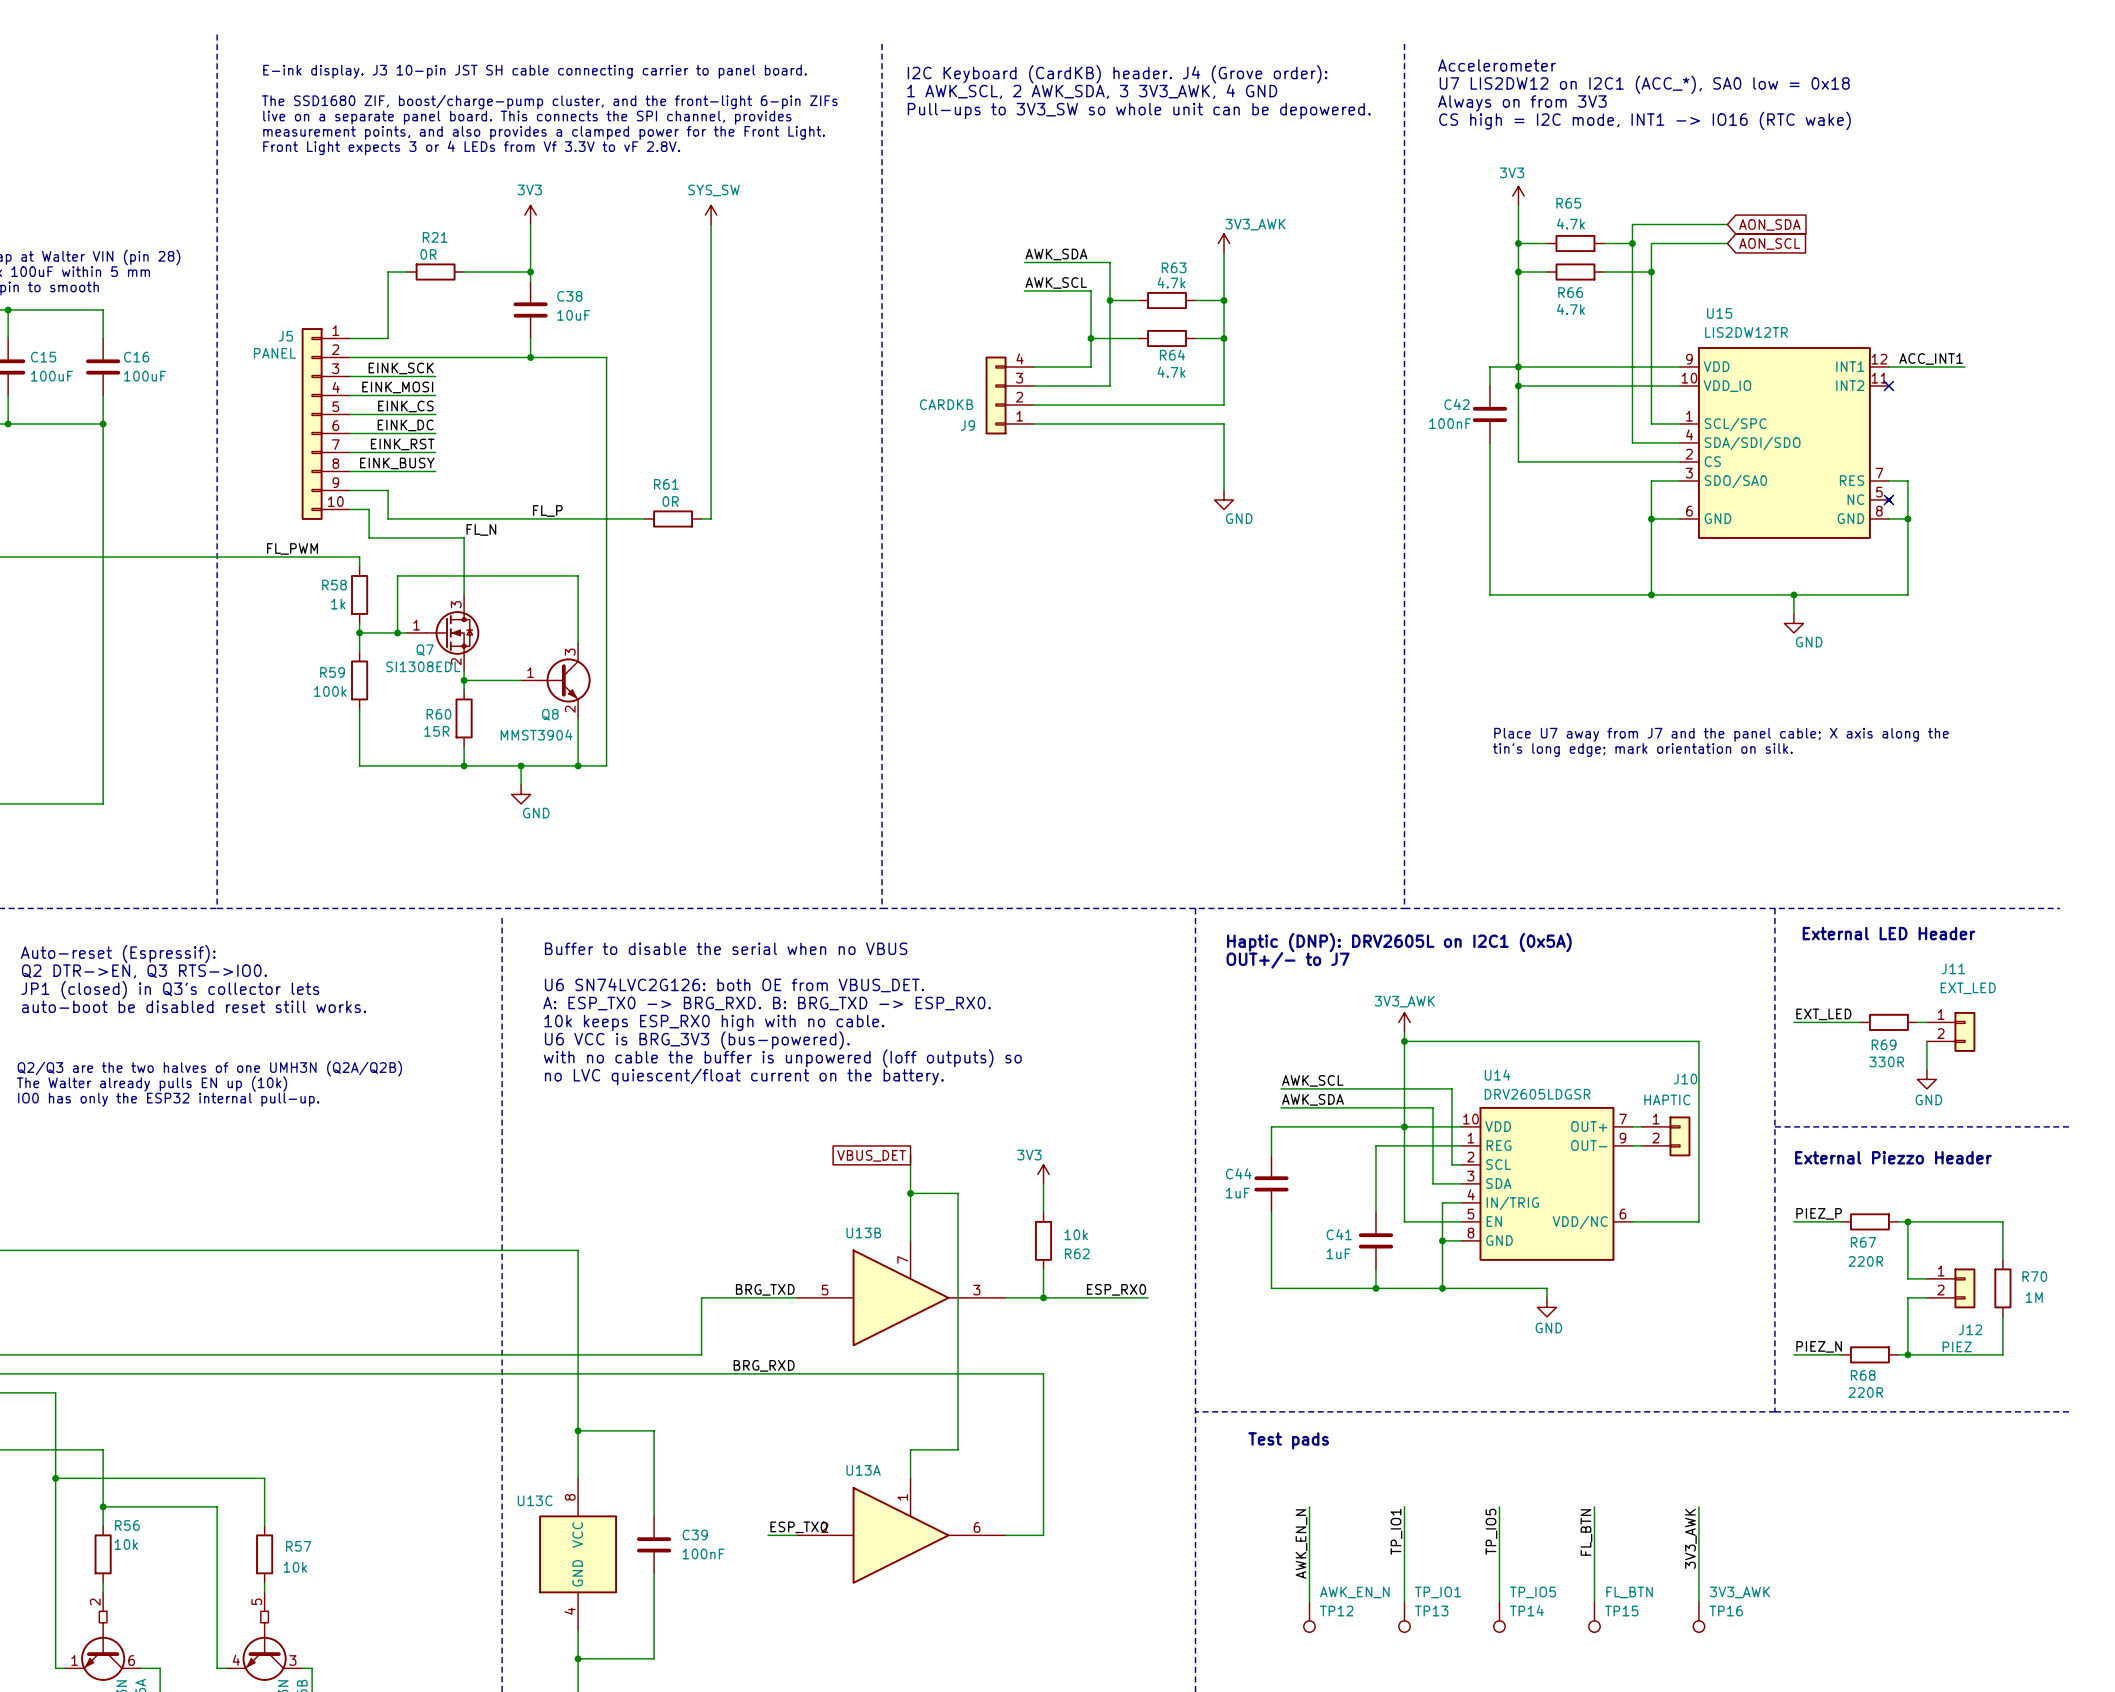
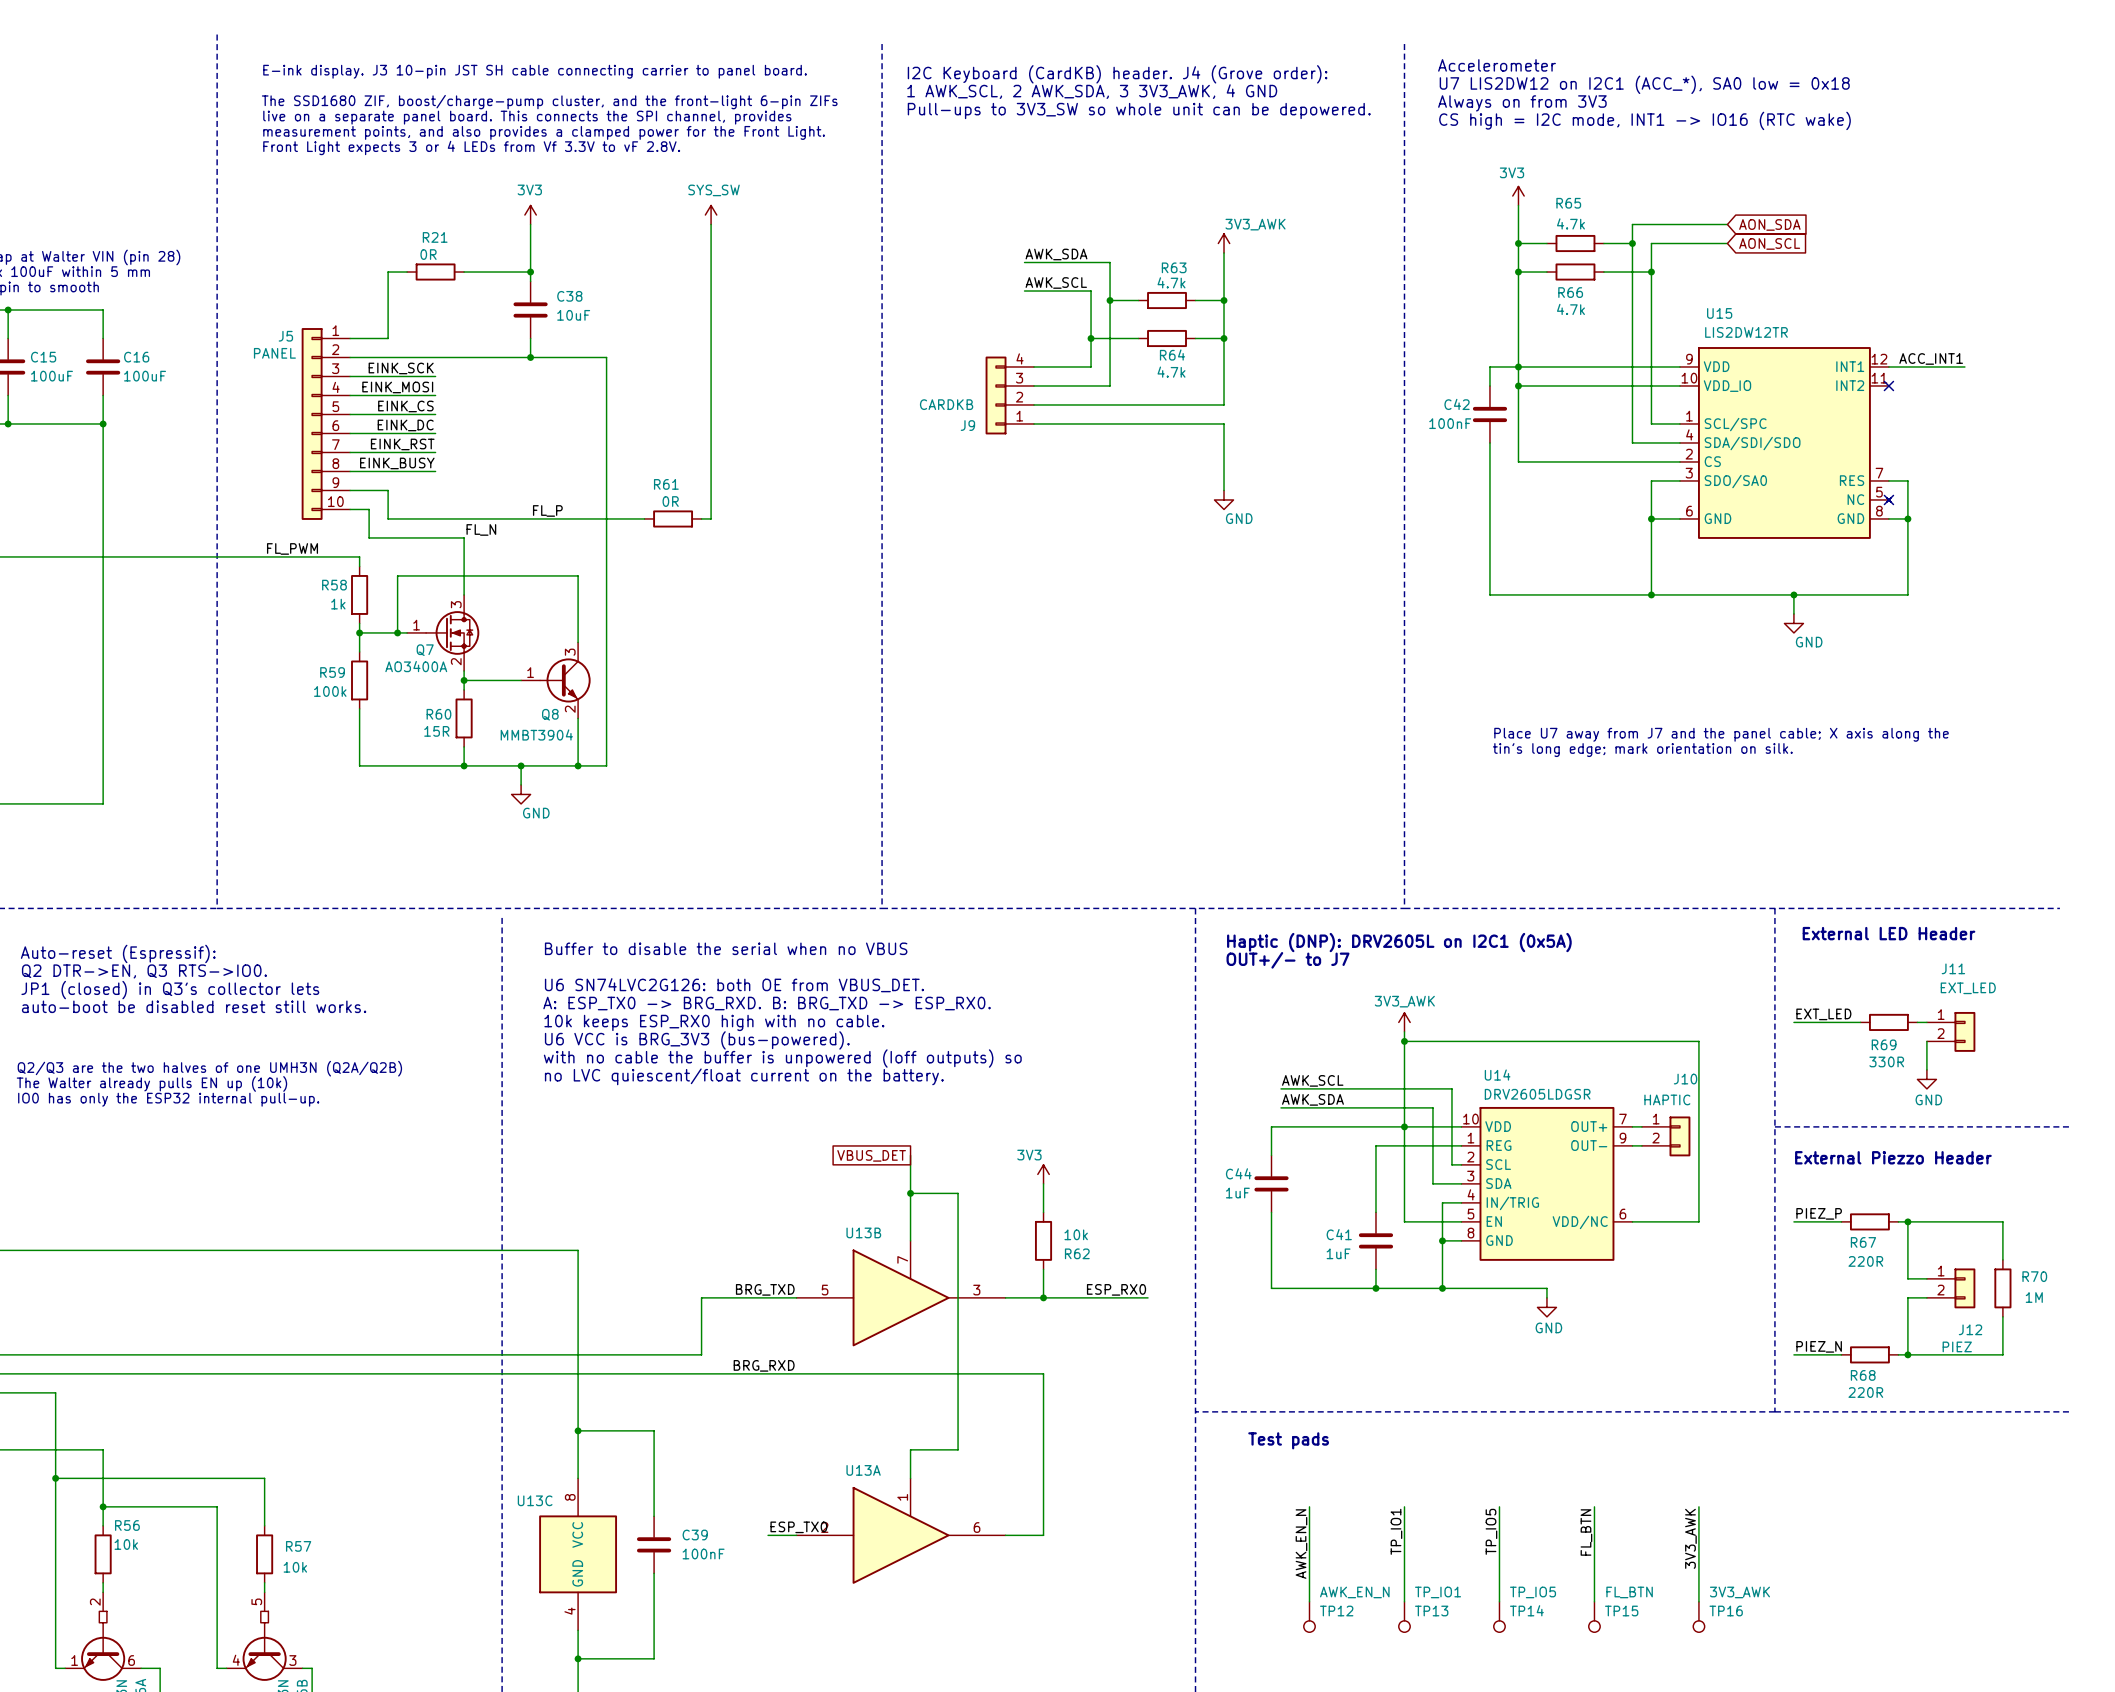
Q7 value: SI1308EDL (423, 666) -> AO3400A (416, 666)
Q8 value: MMST3904 (536, 734) -> MMBT3904 (536, 734)

